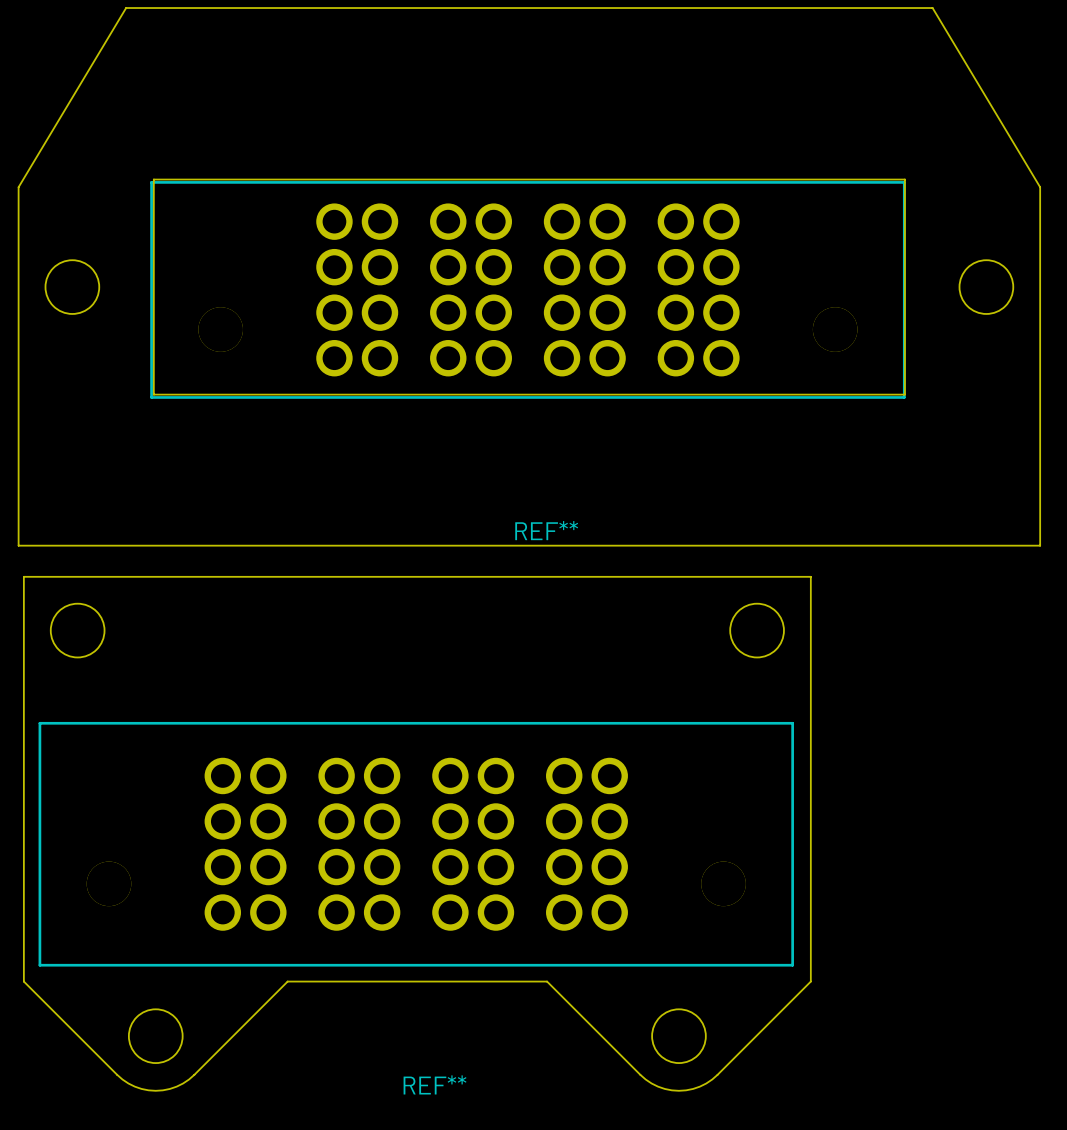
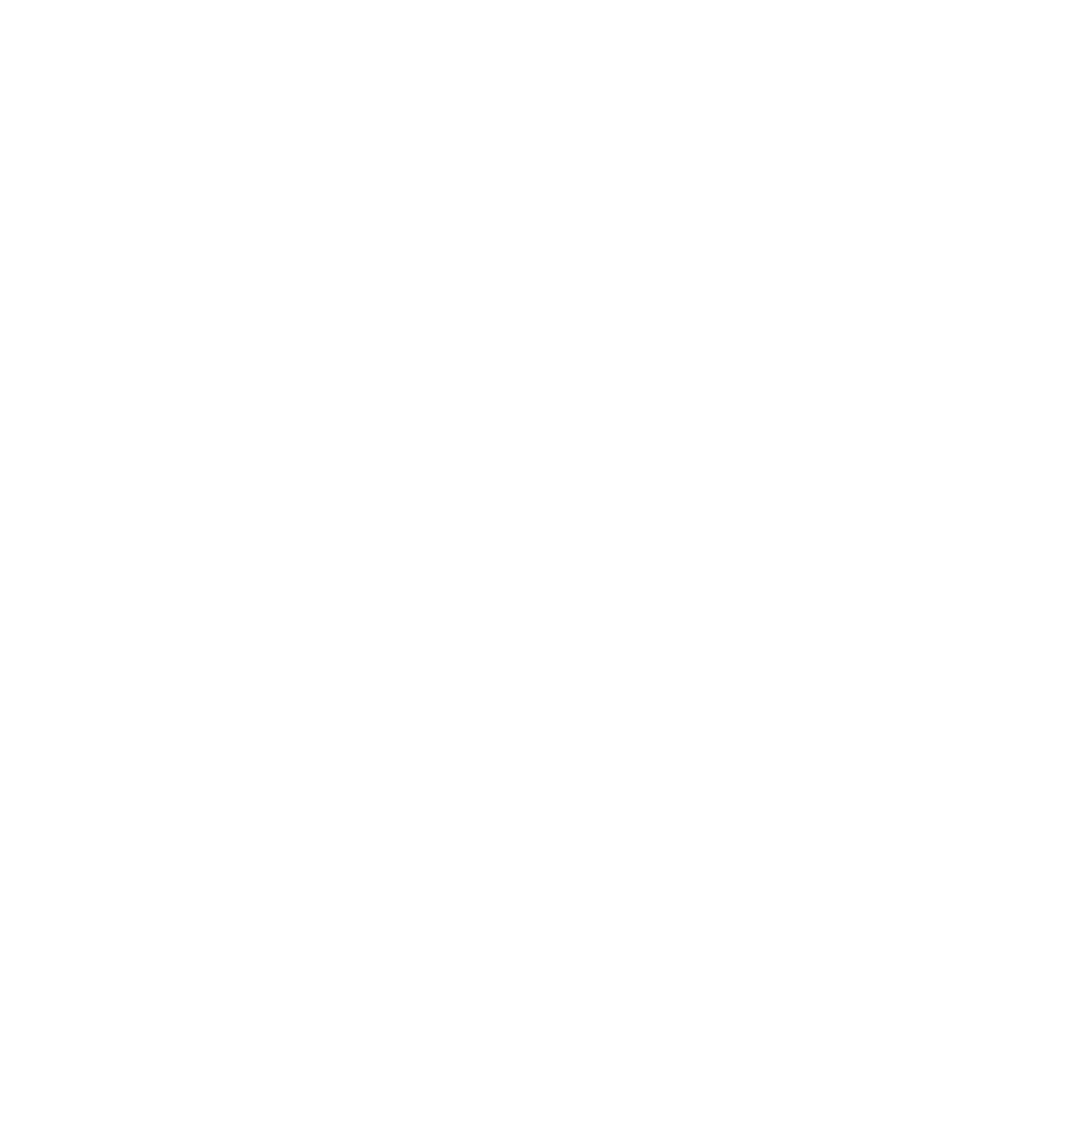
board edge: (126, 8) (18, 187) (18, 545) (1040, 545) (1040, 187) (932, 8) (126, 8) -> none
board edge: (153, 179) (904, 179) (904, 394) (153, 394) (153, 179) -> none
round board edge: [44, 259, 101, 315] -> none
round board edge: [958, 259, 1015, 315] -> none
REF**: (527, 289) -> none
board edge: (23, 576) (23, 981) (117, 1074) (128, 1083) (141, 1088) (155, 1090) (169, 1088) (183, 1083) (194, 1074) (287, 981) (547, 981) (645, 1079) (664, 1088) (686, 1090) (699, 1086) (712, 1079) (810, 981) (810, 576) (23, 576) -> none
round board edge: [49, 602, 106, 659] -> none
round board edge: [729, 602, 785, 659] -> none
REF**: (416, 844) -> none
round board edge: [127, 1008, 184, 1064] -> none
round board edge: [651, 1008, 707, 1064] -> none

